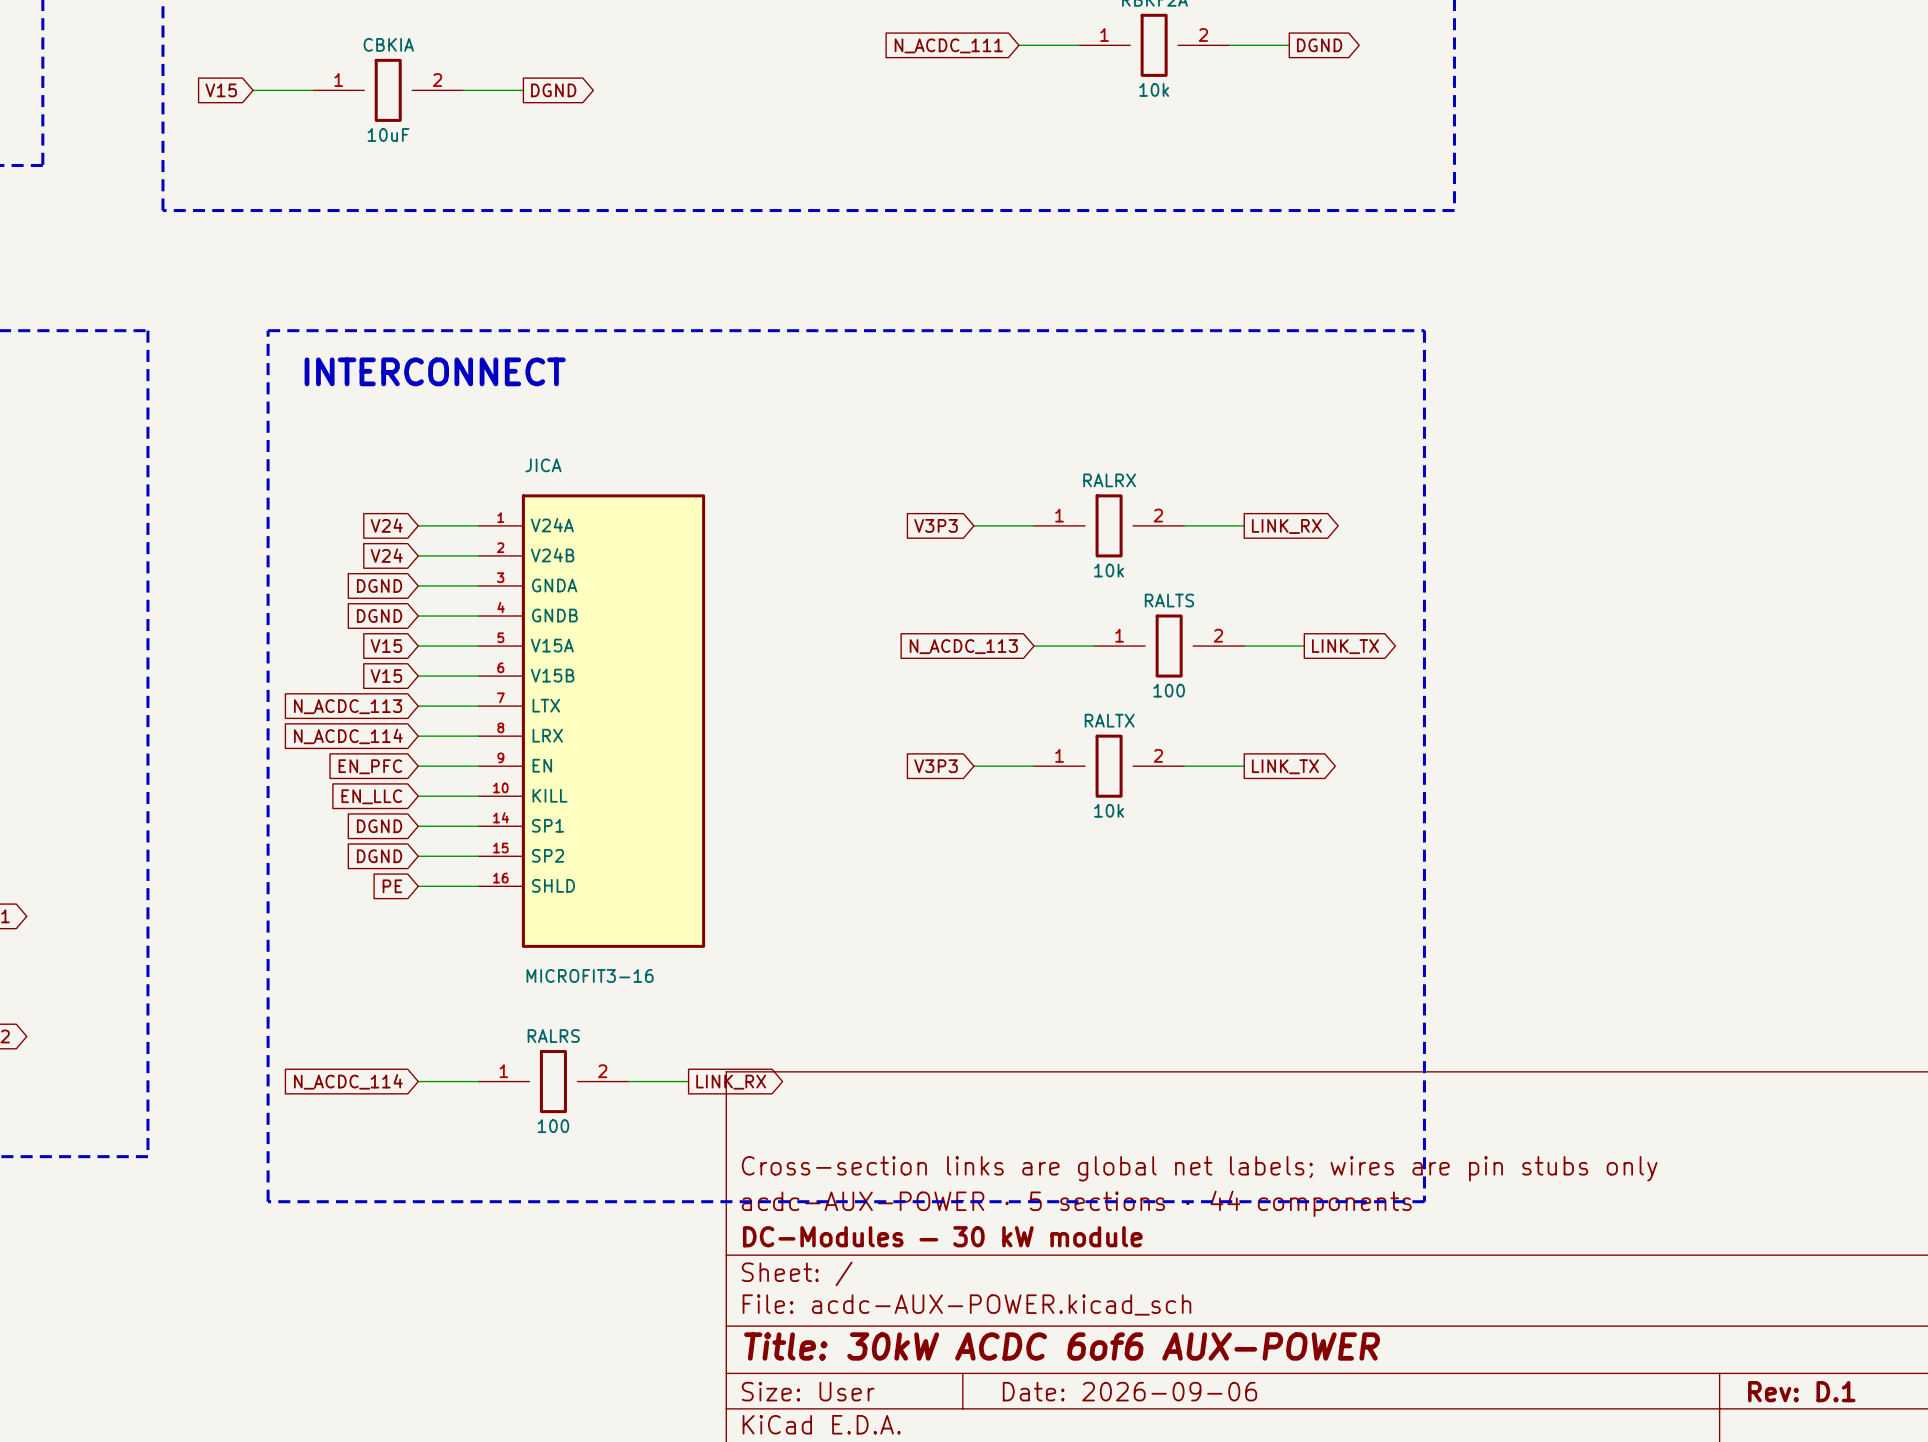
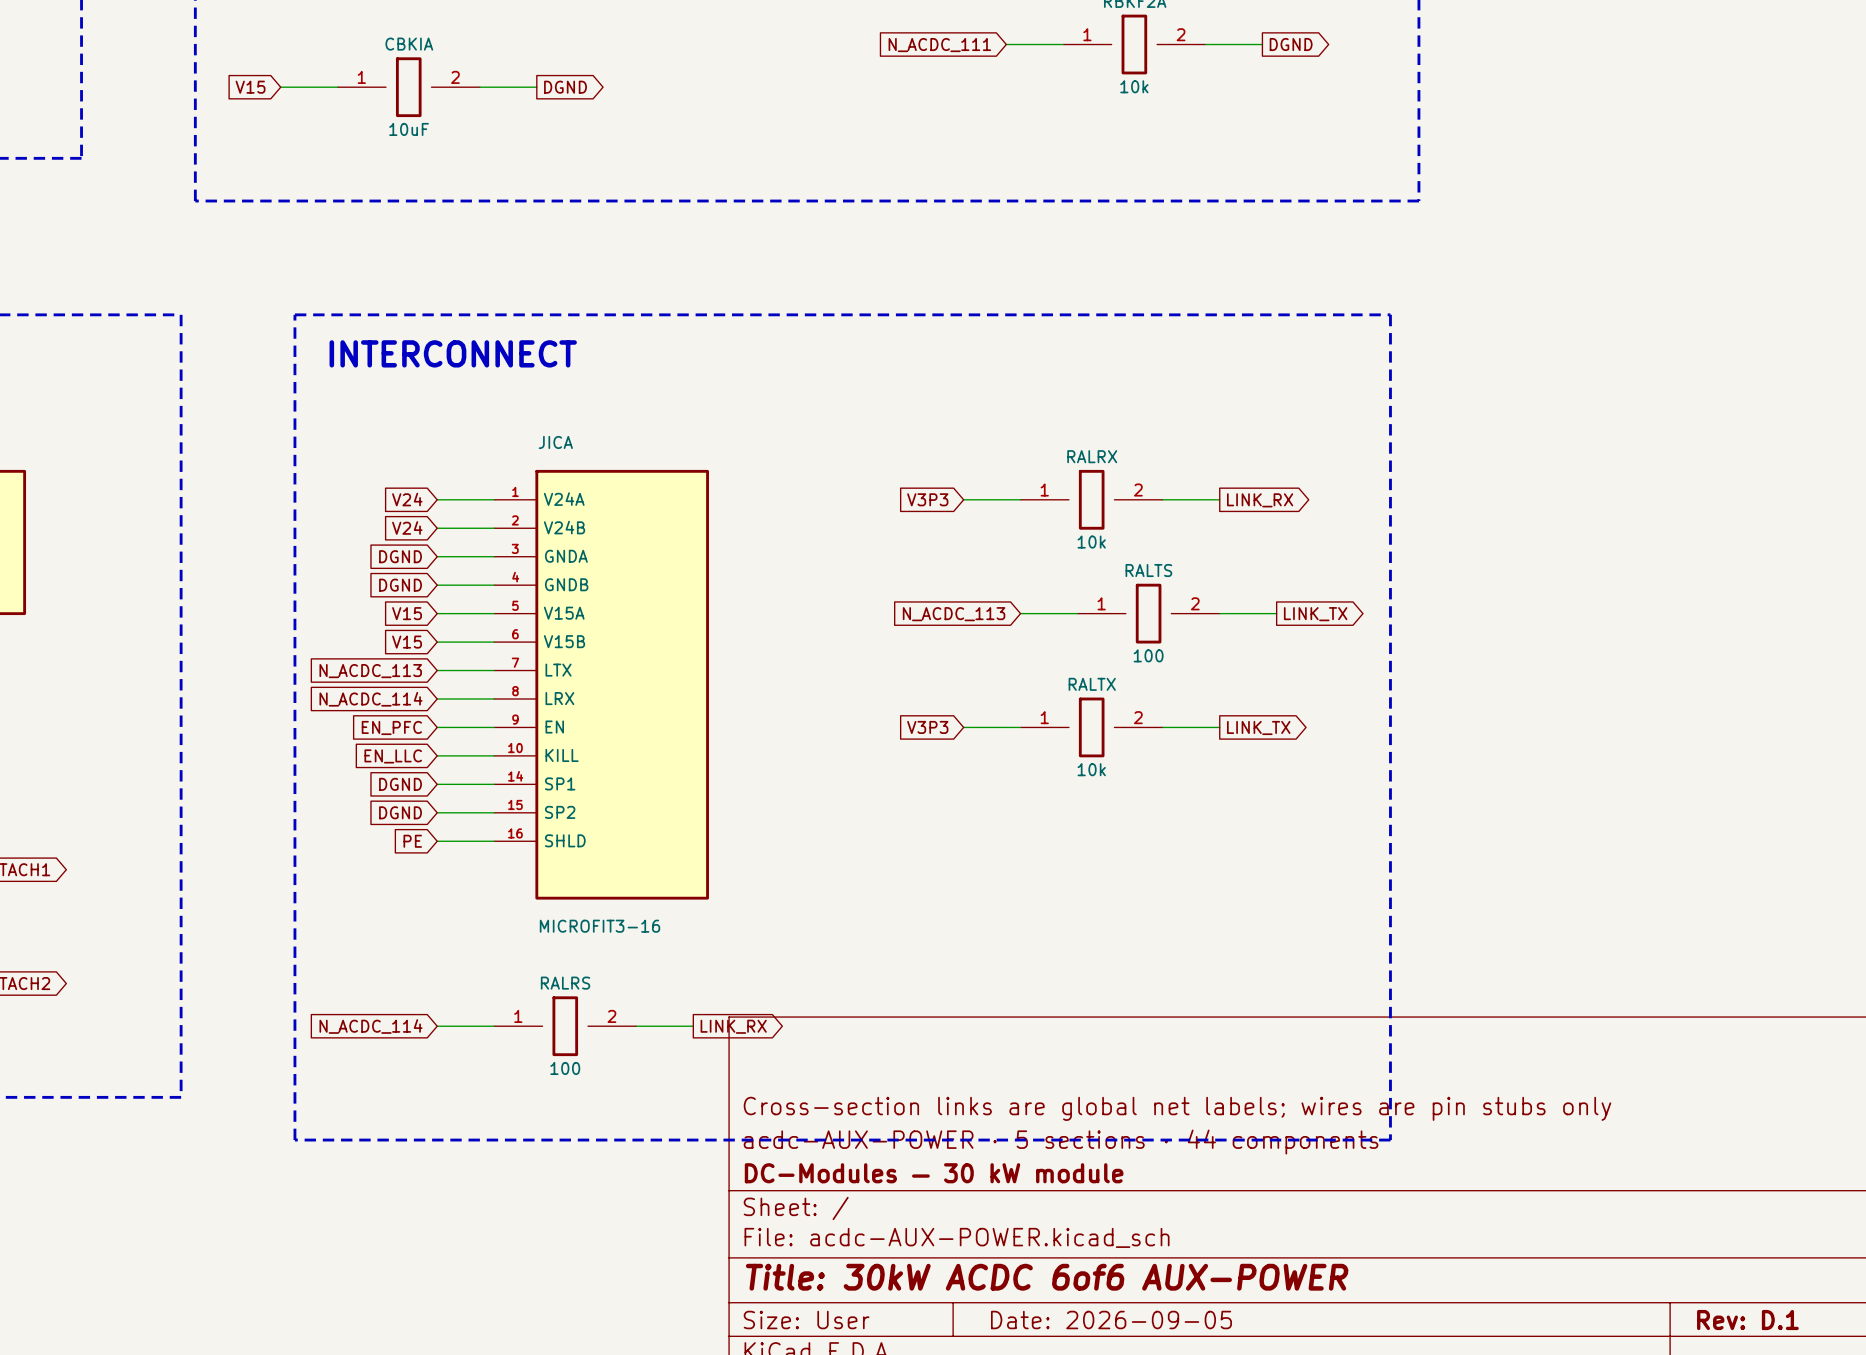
title block: Date: 2026-09-06 (1129, 1391) -> Date: 2026-09-05 (1111, 1320)

